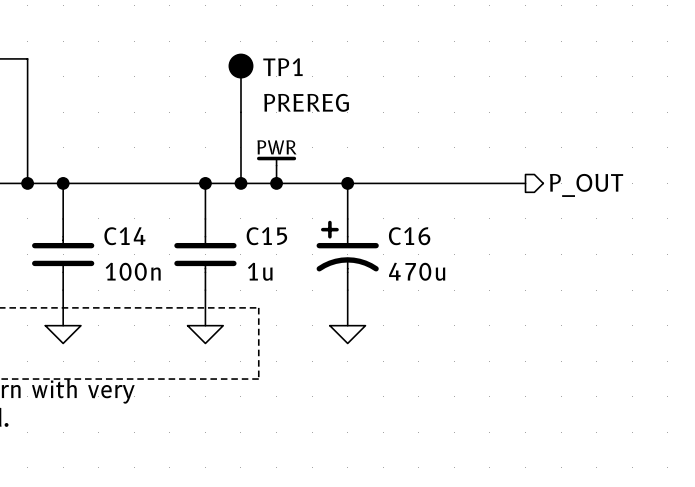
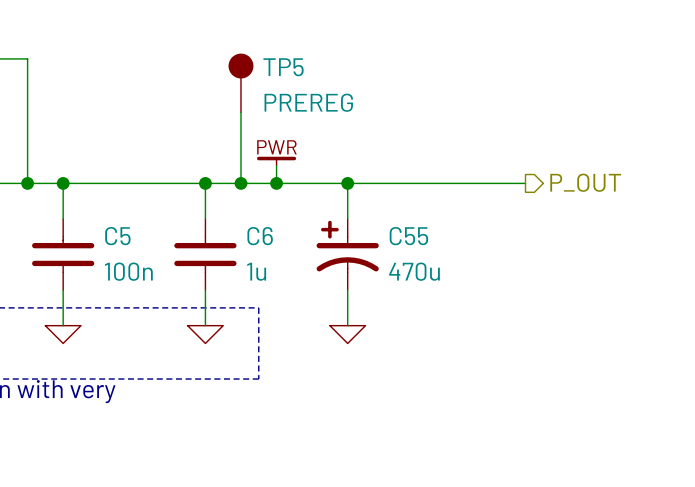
TP1 name: TP1 (282, 67) -> TP5 (283, 67)
C14 name: C14 (124, 236) -> C5 (117, 236)
C15 name: C15 (266, 236) -> C6 (260, 236)
C16 name: C16 (409, 236) -> C55 (408, 236)

